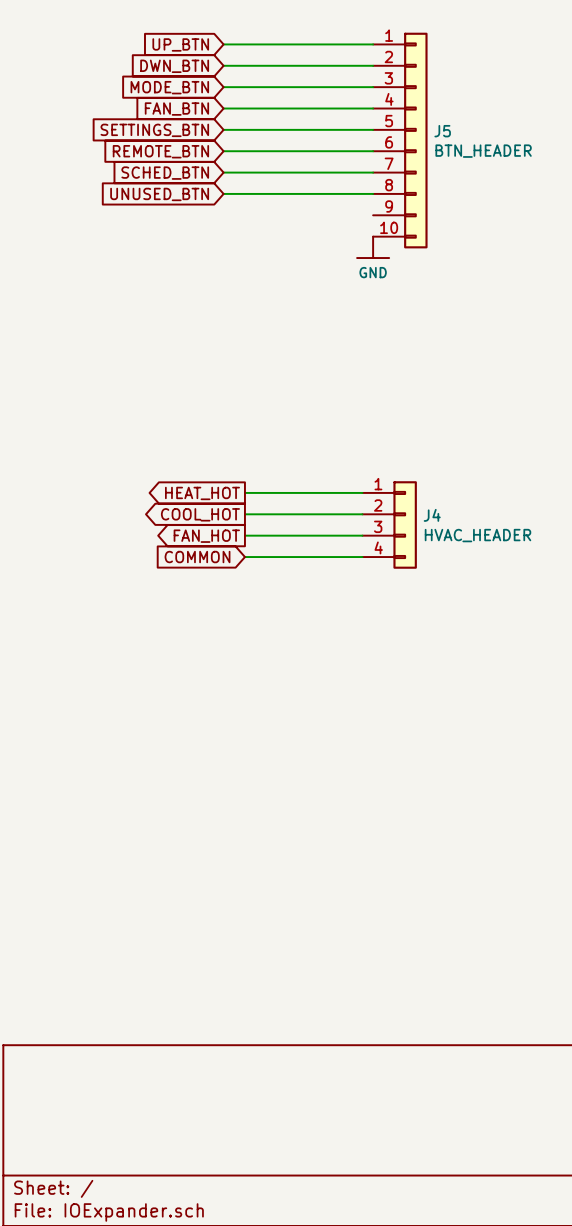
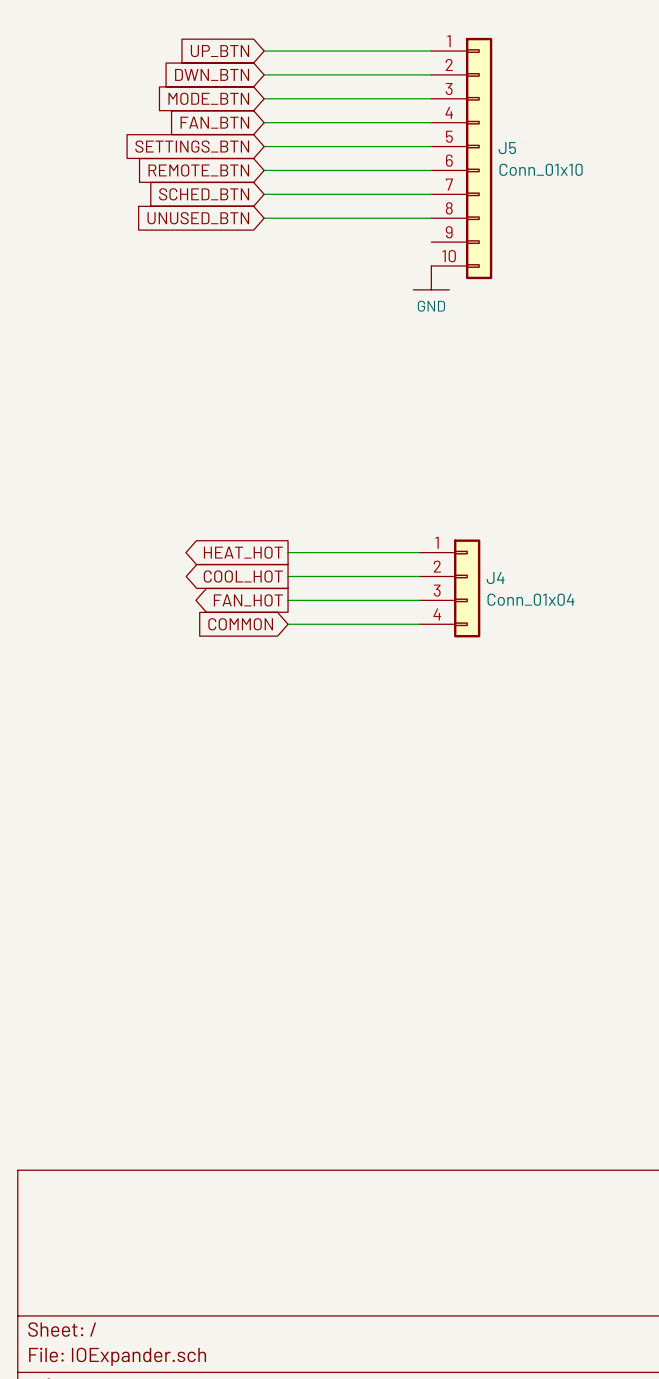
J5 value: BTN_HEADER (483, 151) -> Conn_01x10 (541, 169)
J4 value: HVAC_HEADER (477, 535) -> Conn_01x04 (530, 599)

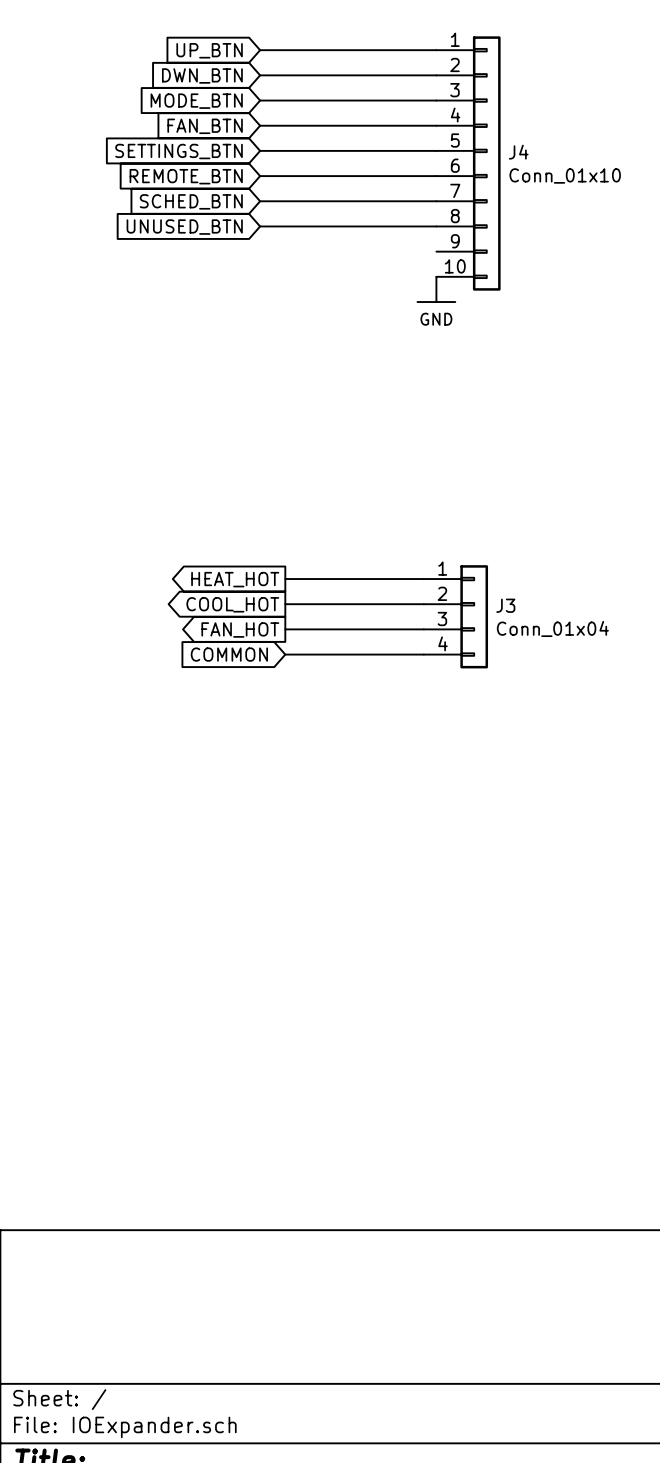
J5 name: J5 (507, 148) -> J4 (518, 152)
J4 name: J4 (495, 578) -> J3 (505, 605)

